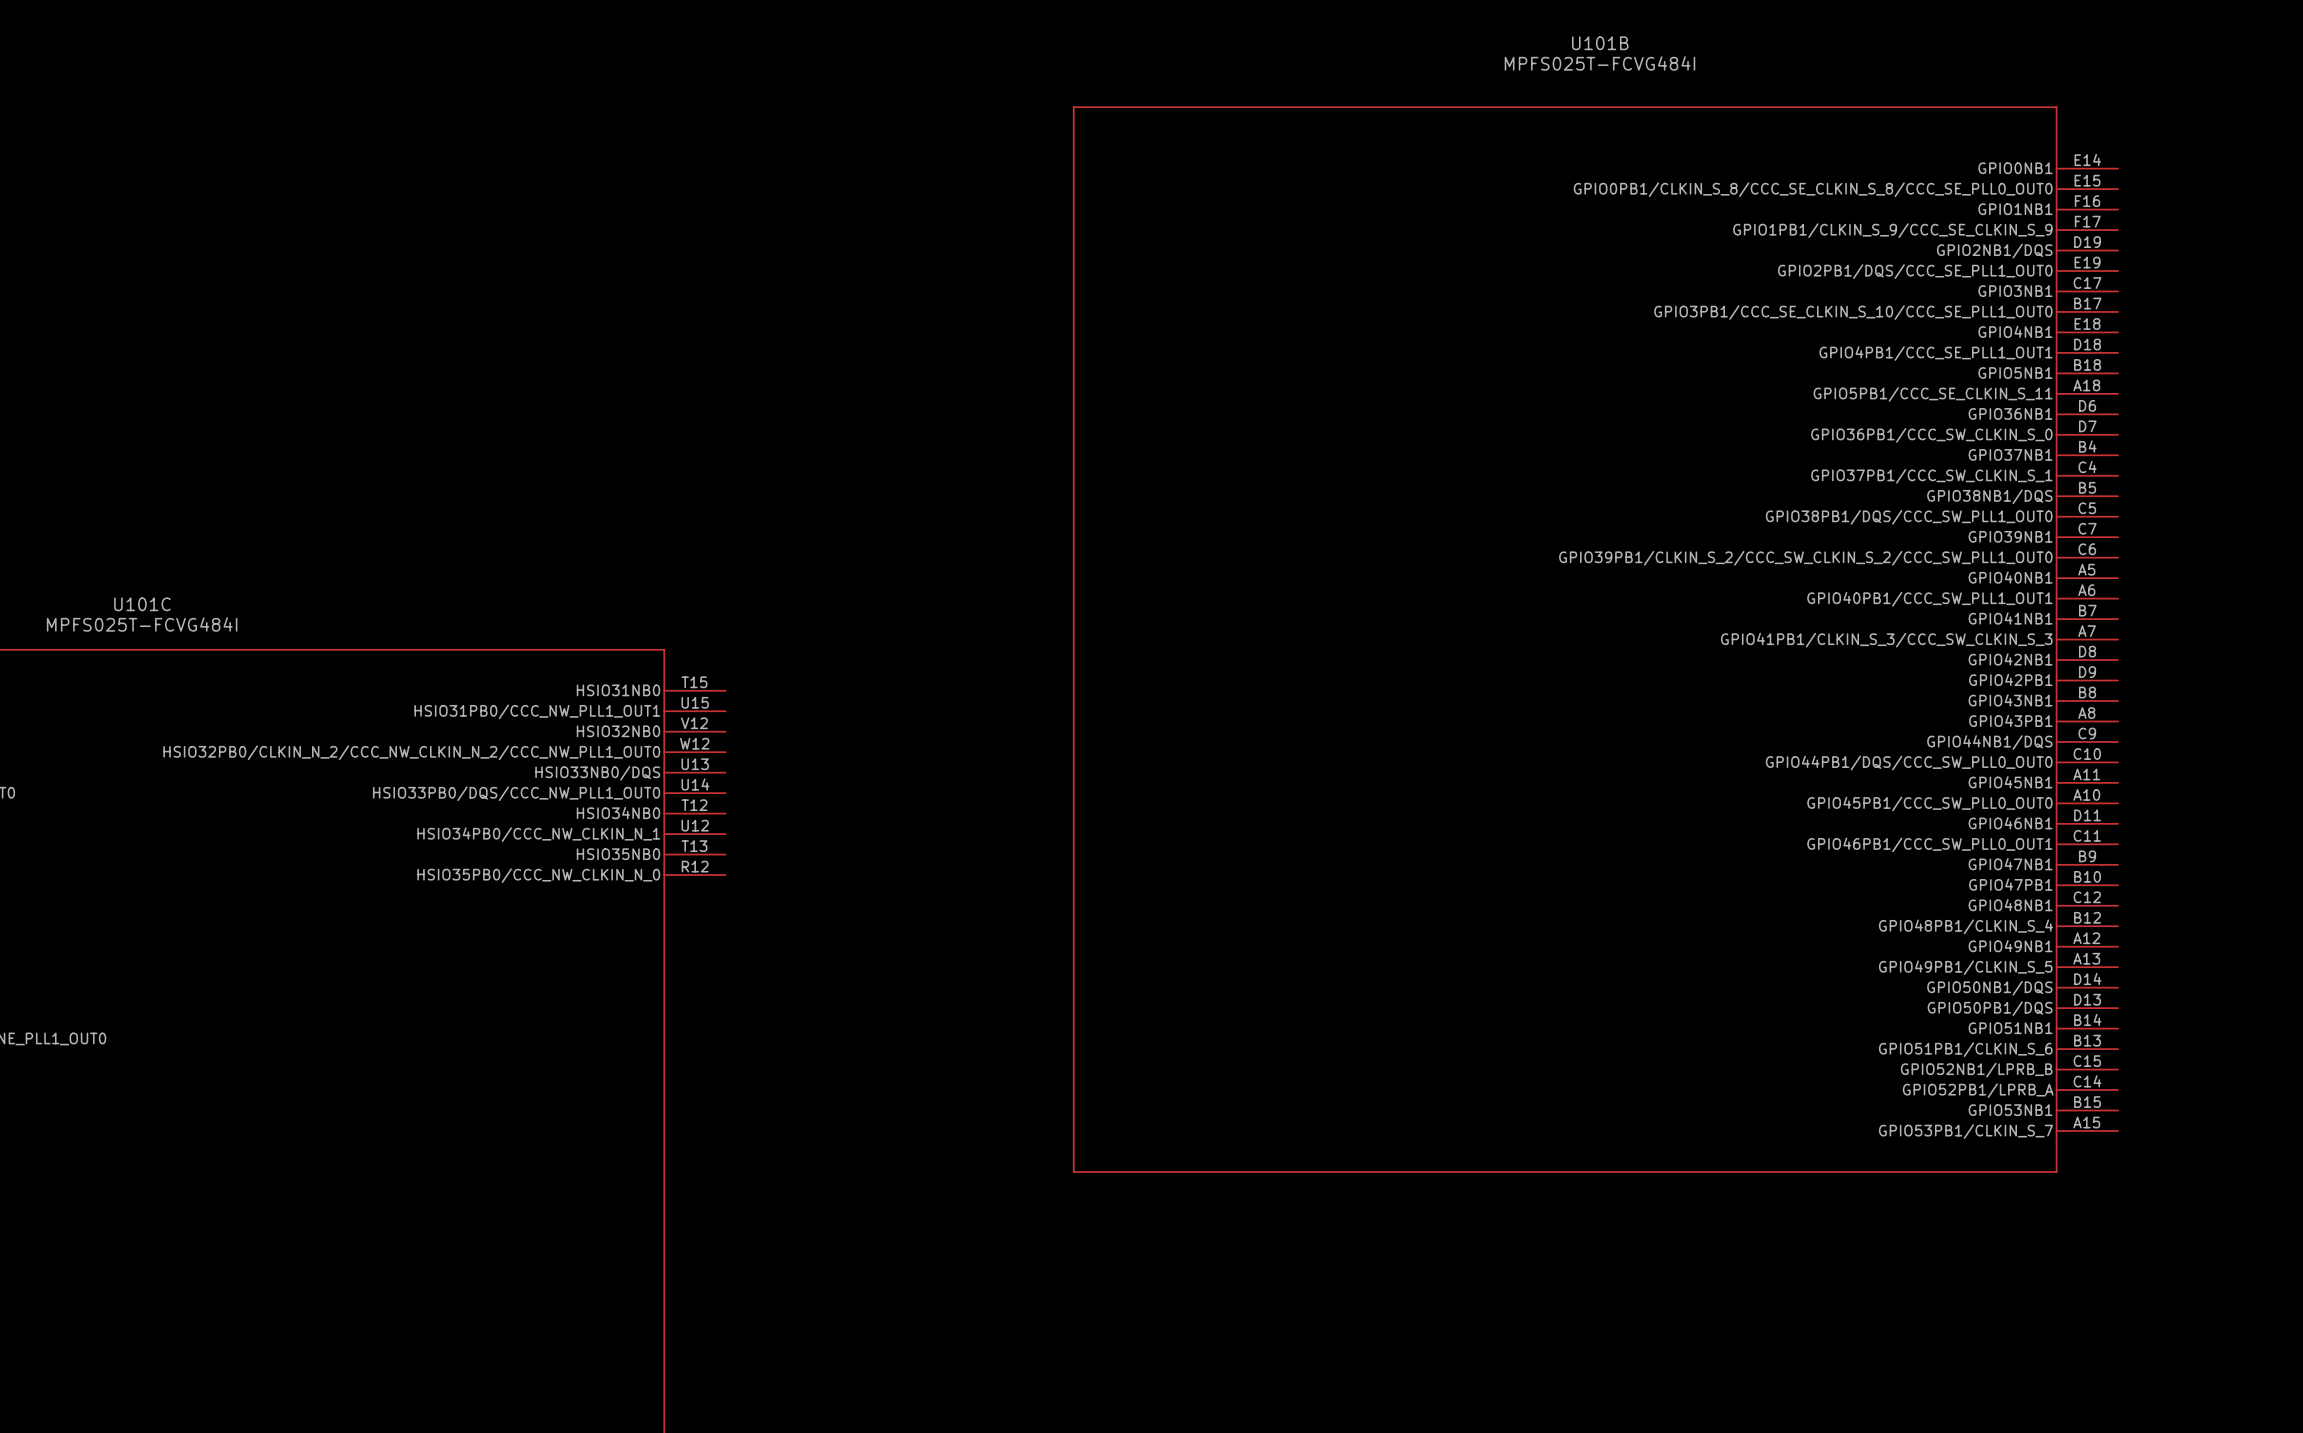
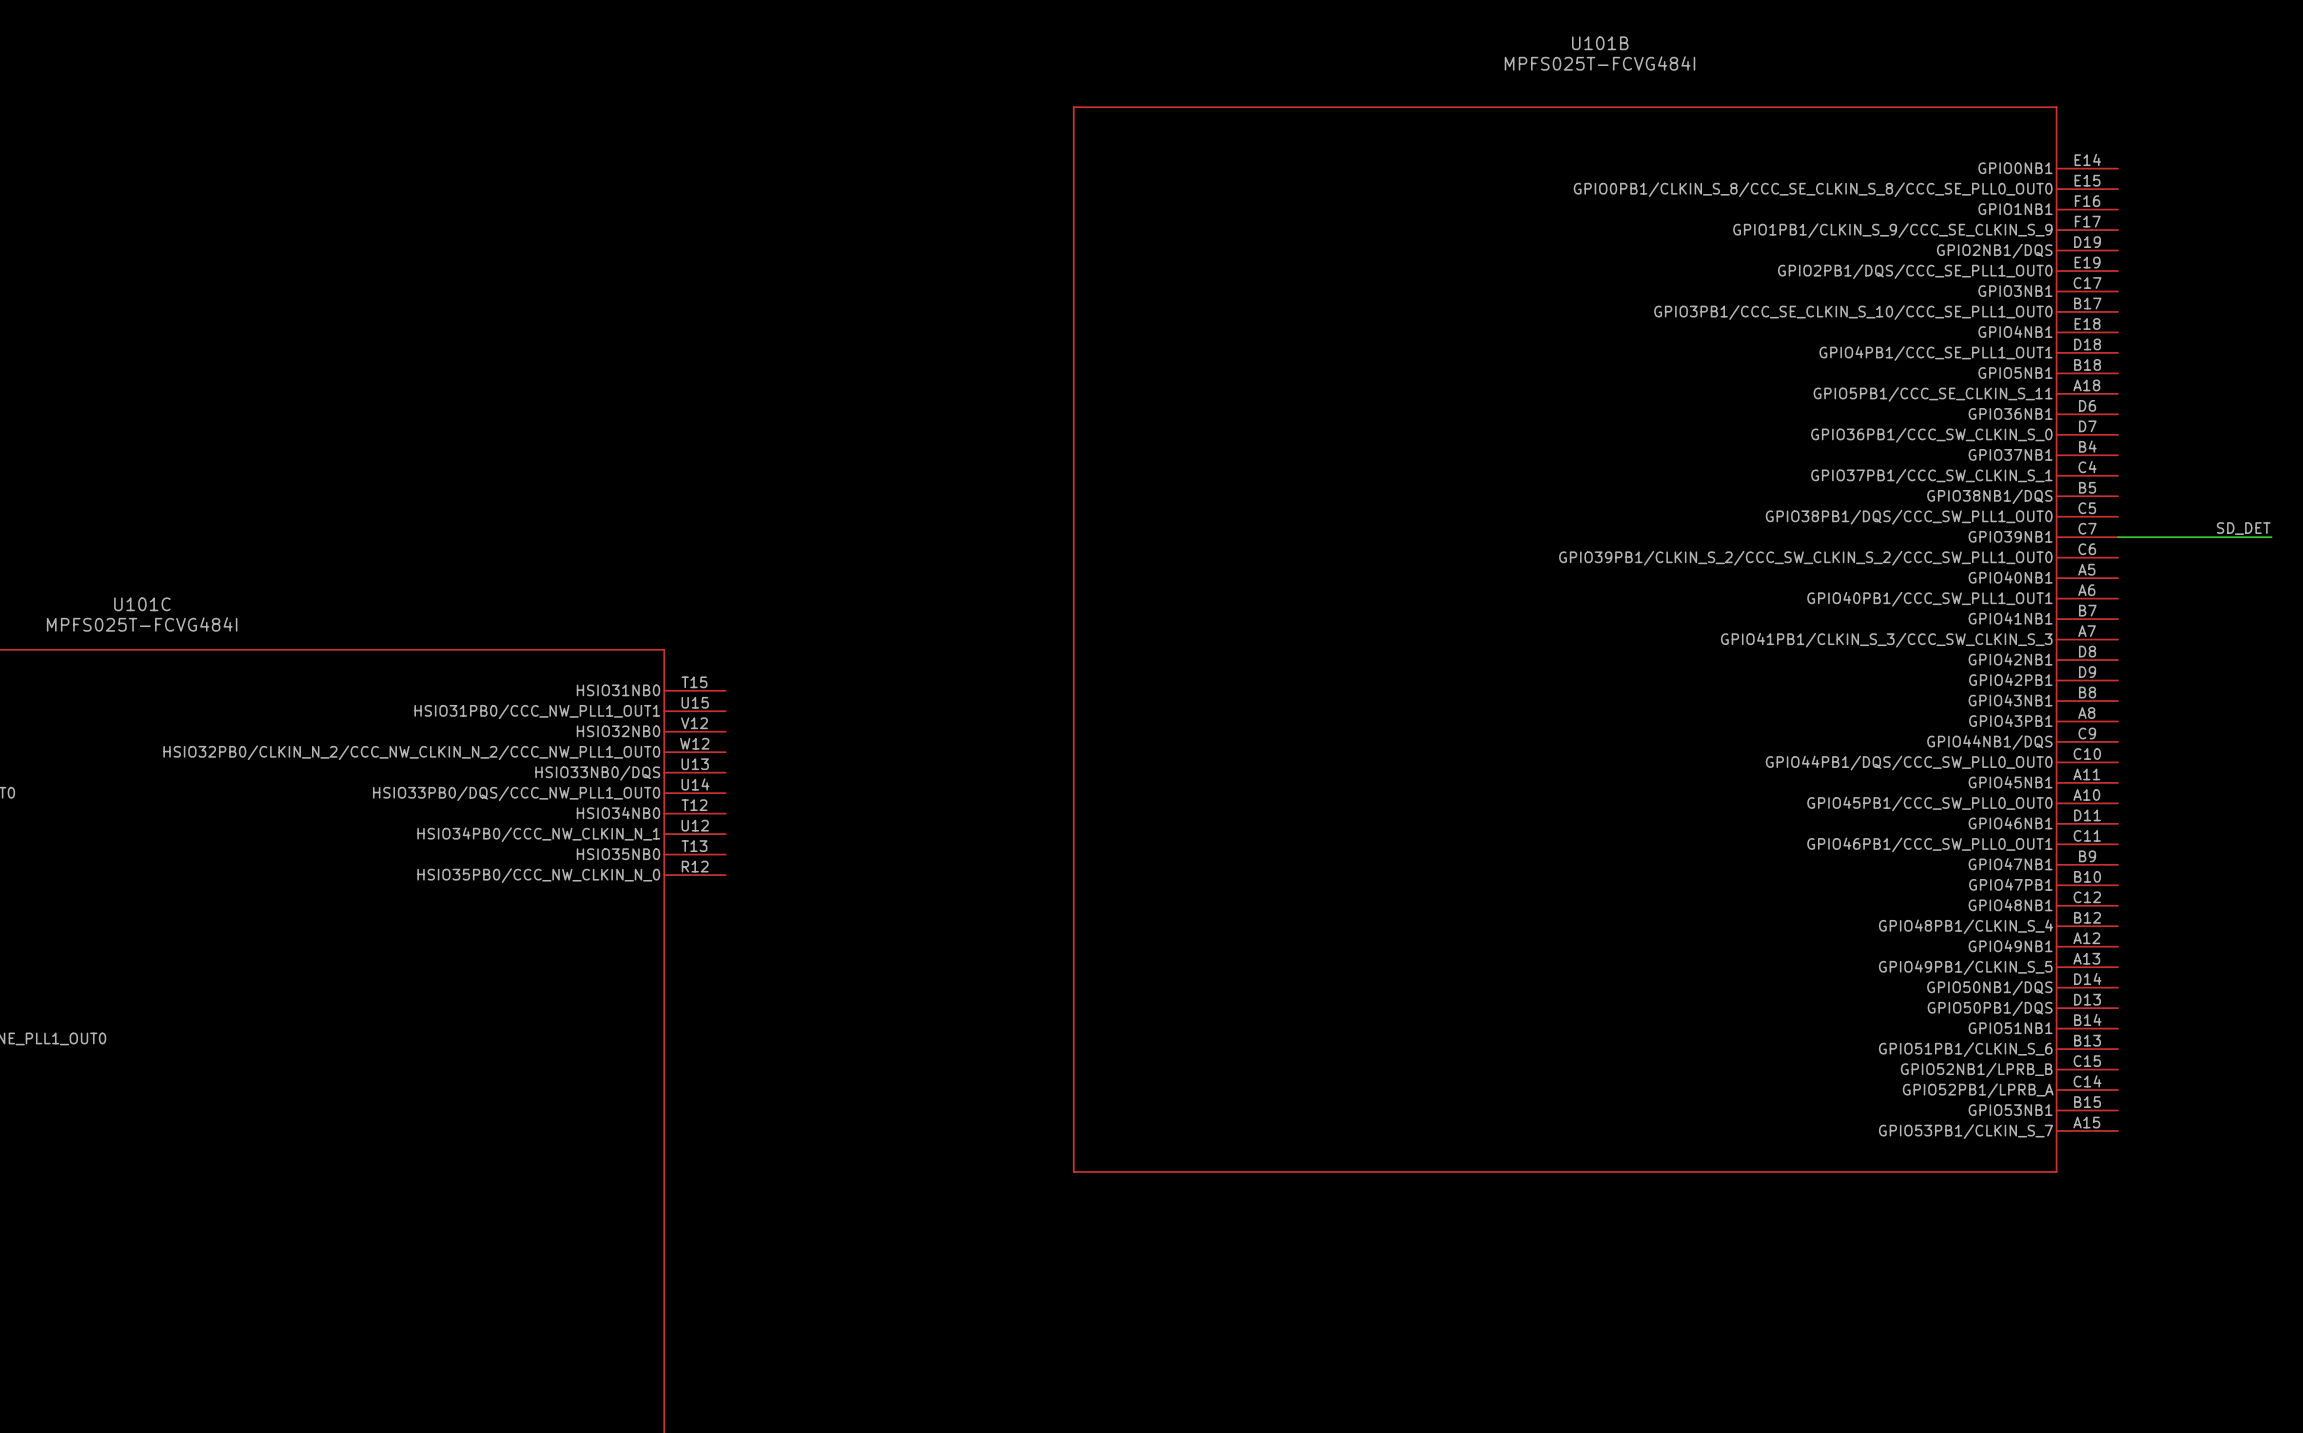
label: none -> SD_DET (2243, 528)
wire: none -> (2118, 537) (2271, 537)

